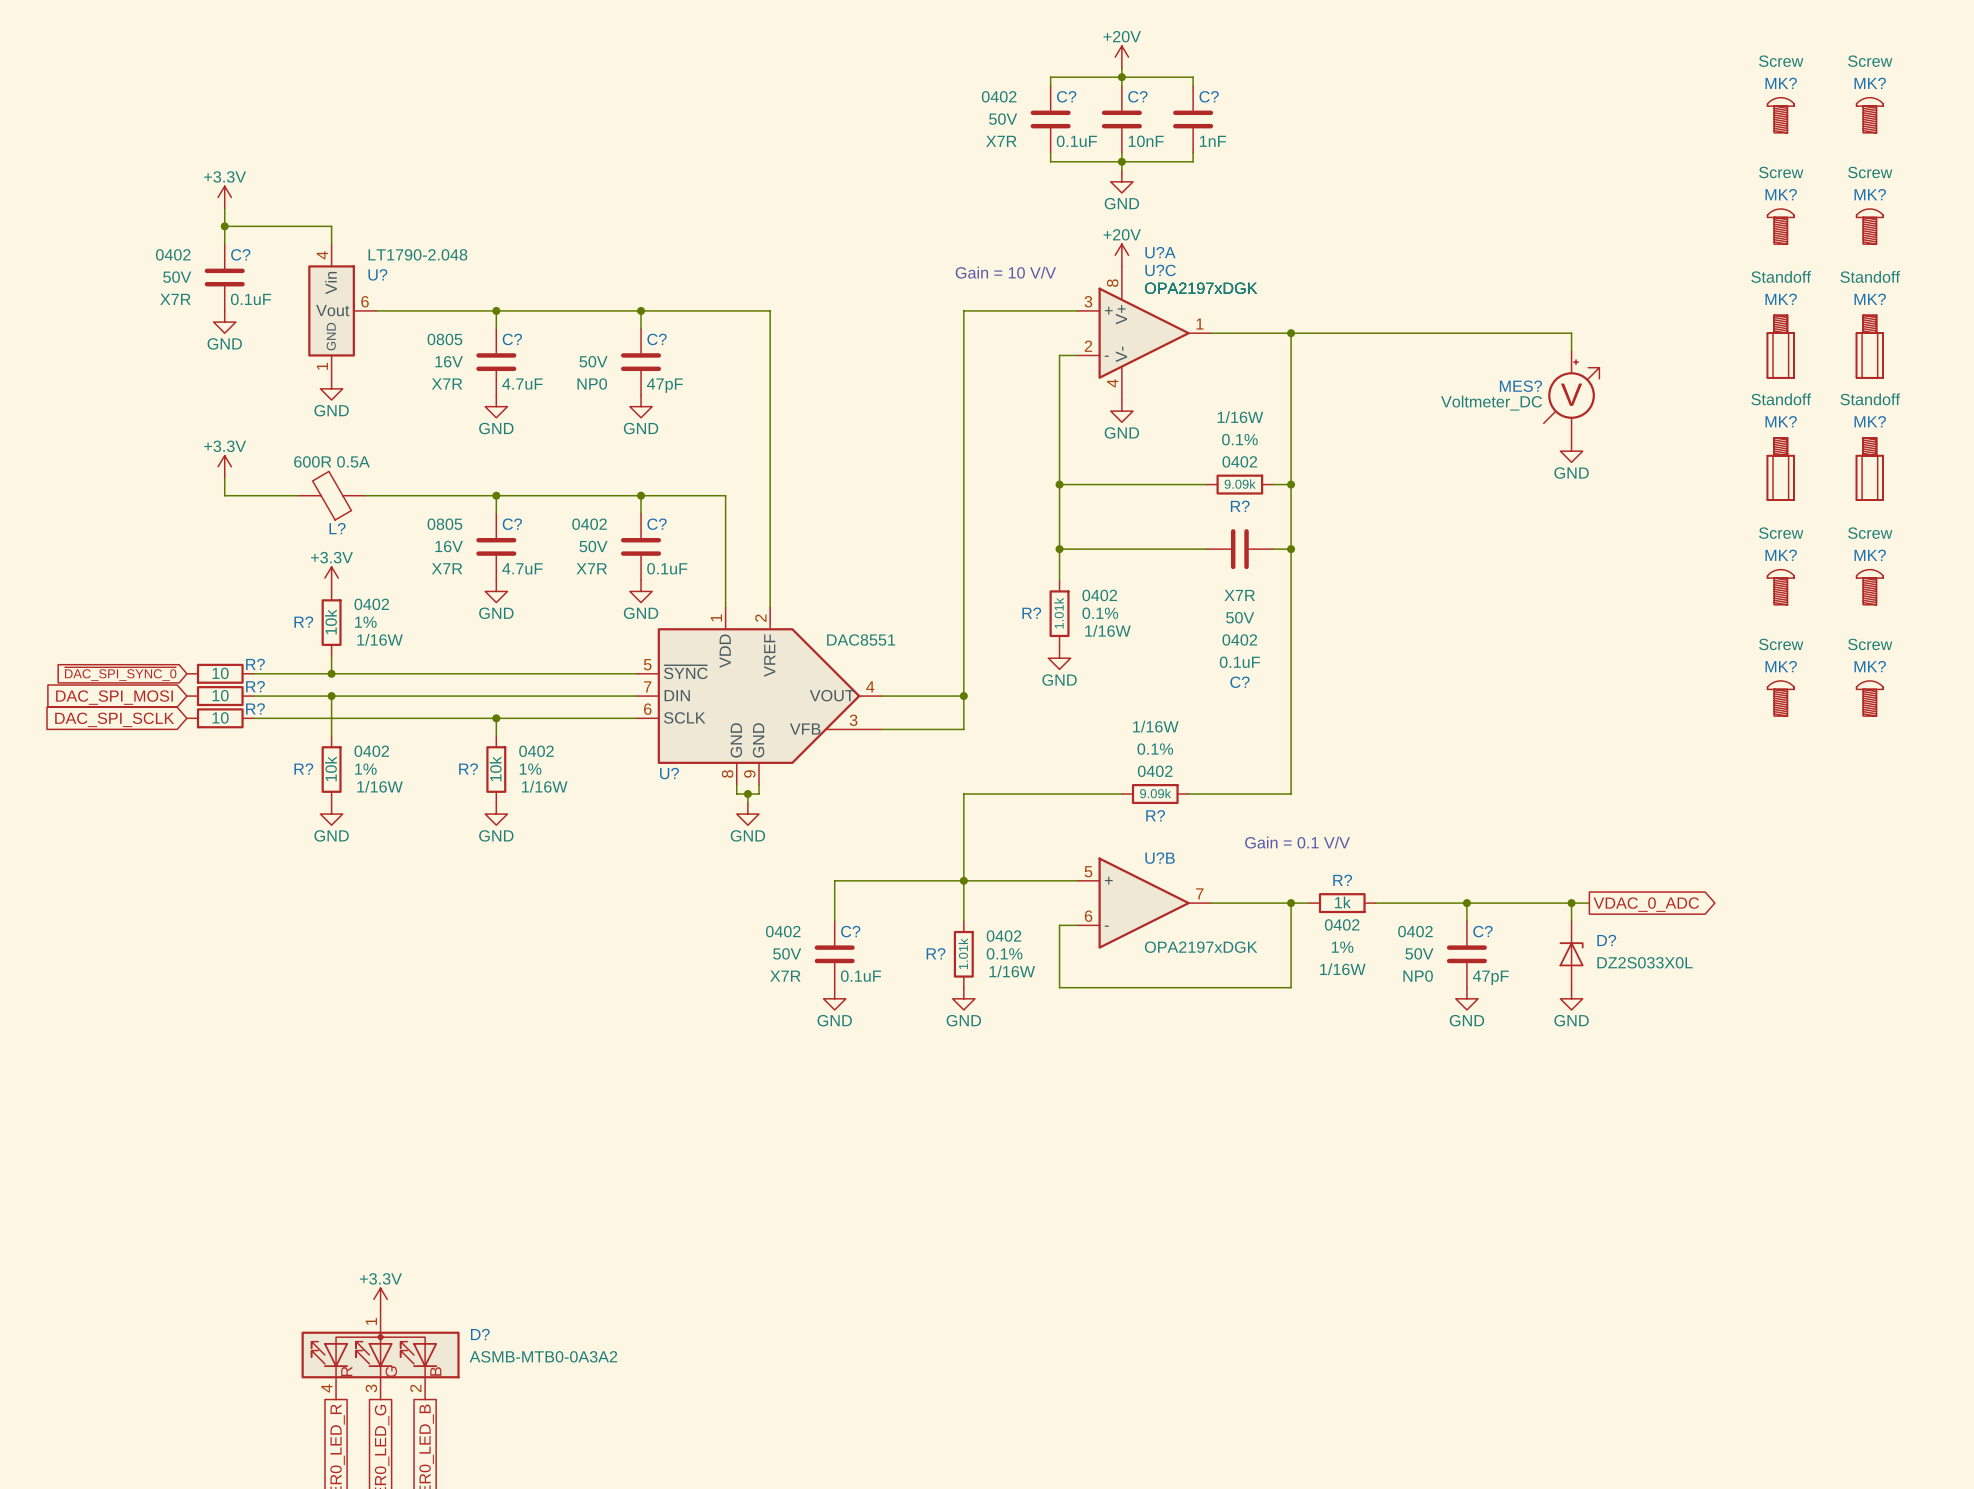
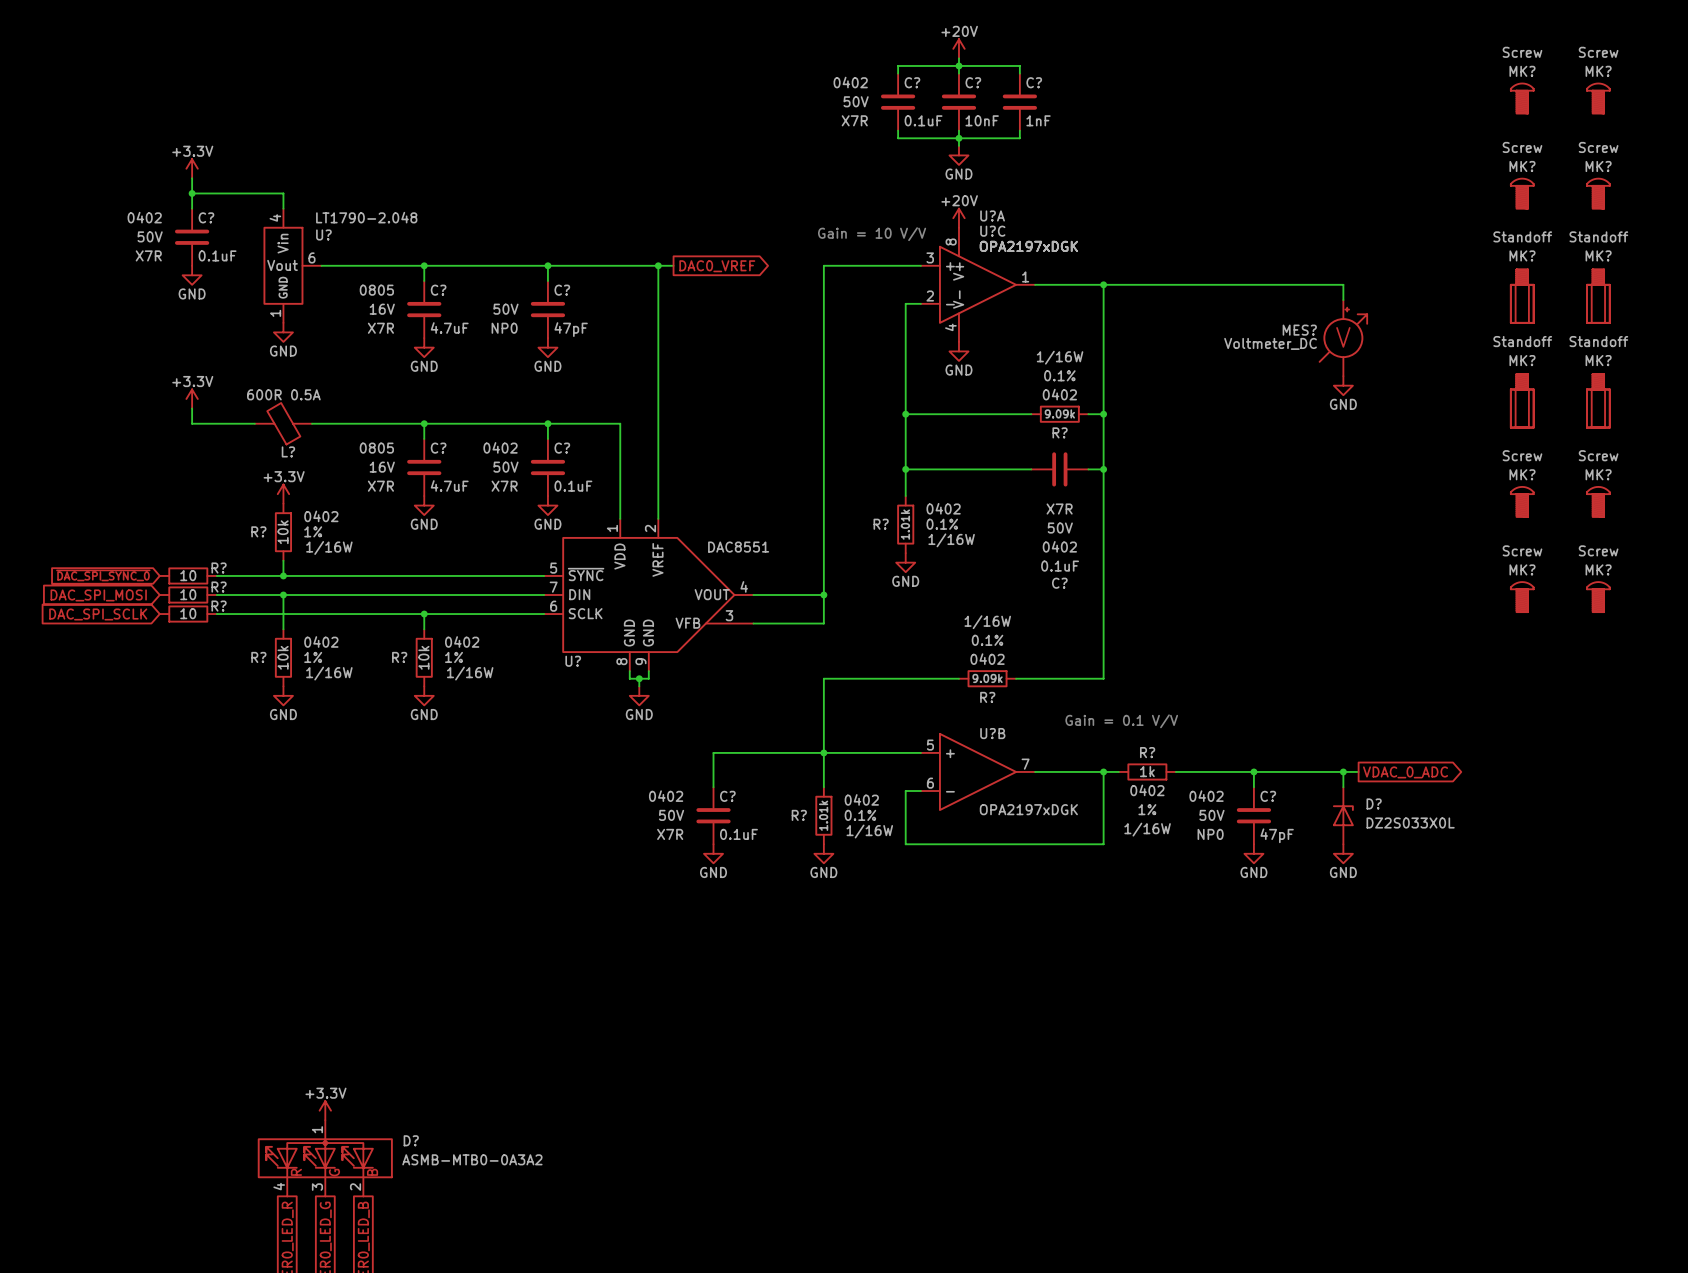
wire: none -> (658, 265) (673, 265)
junction: none -> (658, 265)
global label: none -> DAC0_VREF (717, 266)

